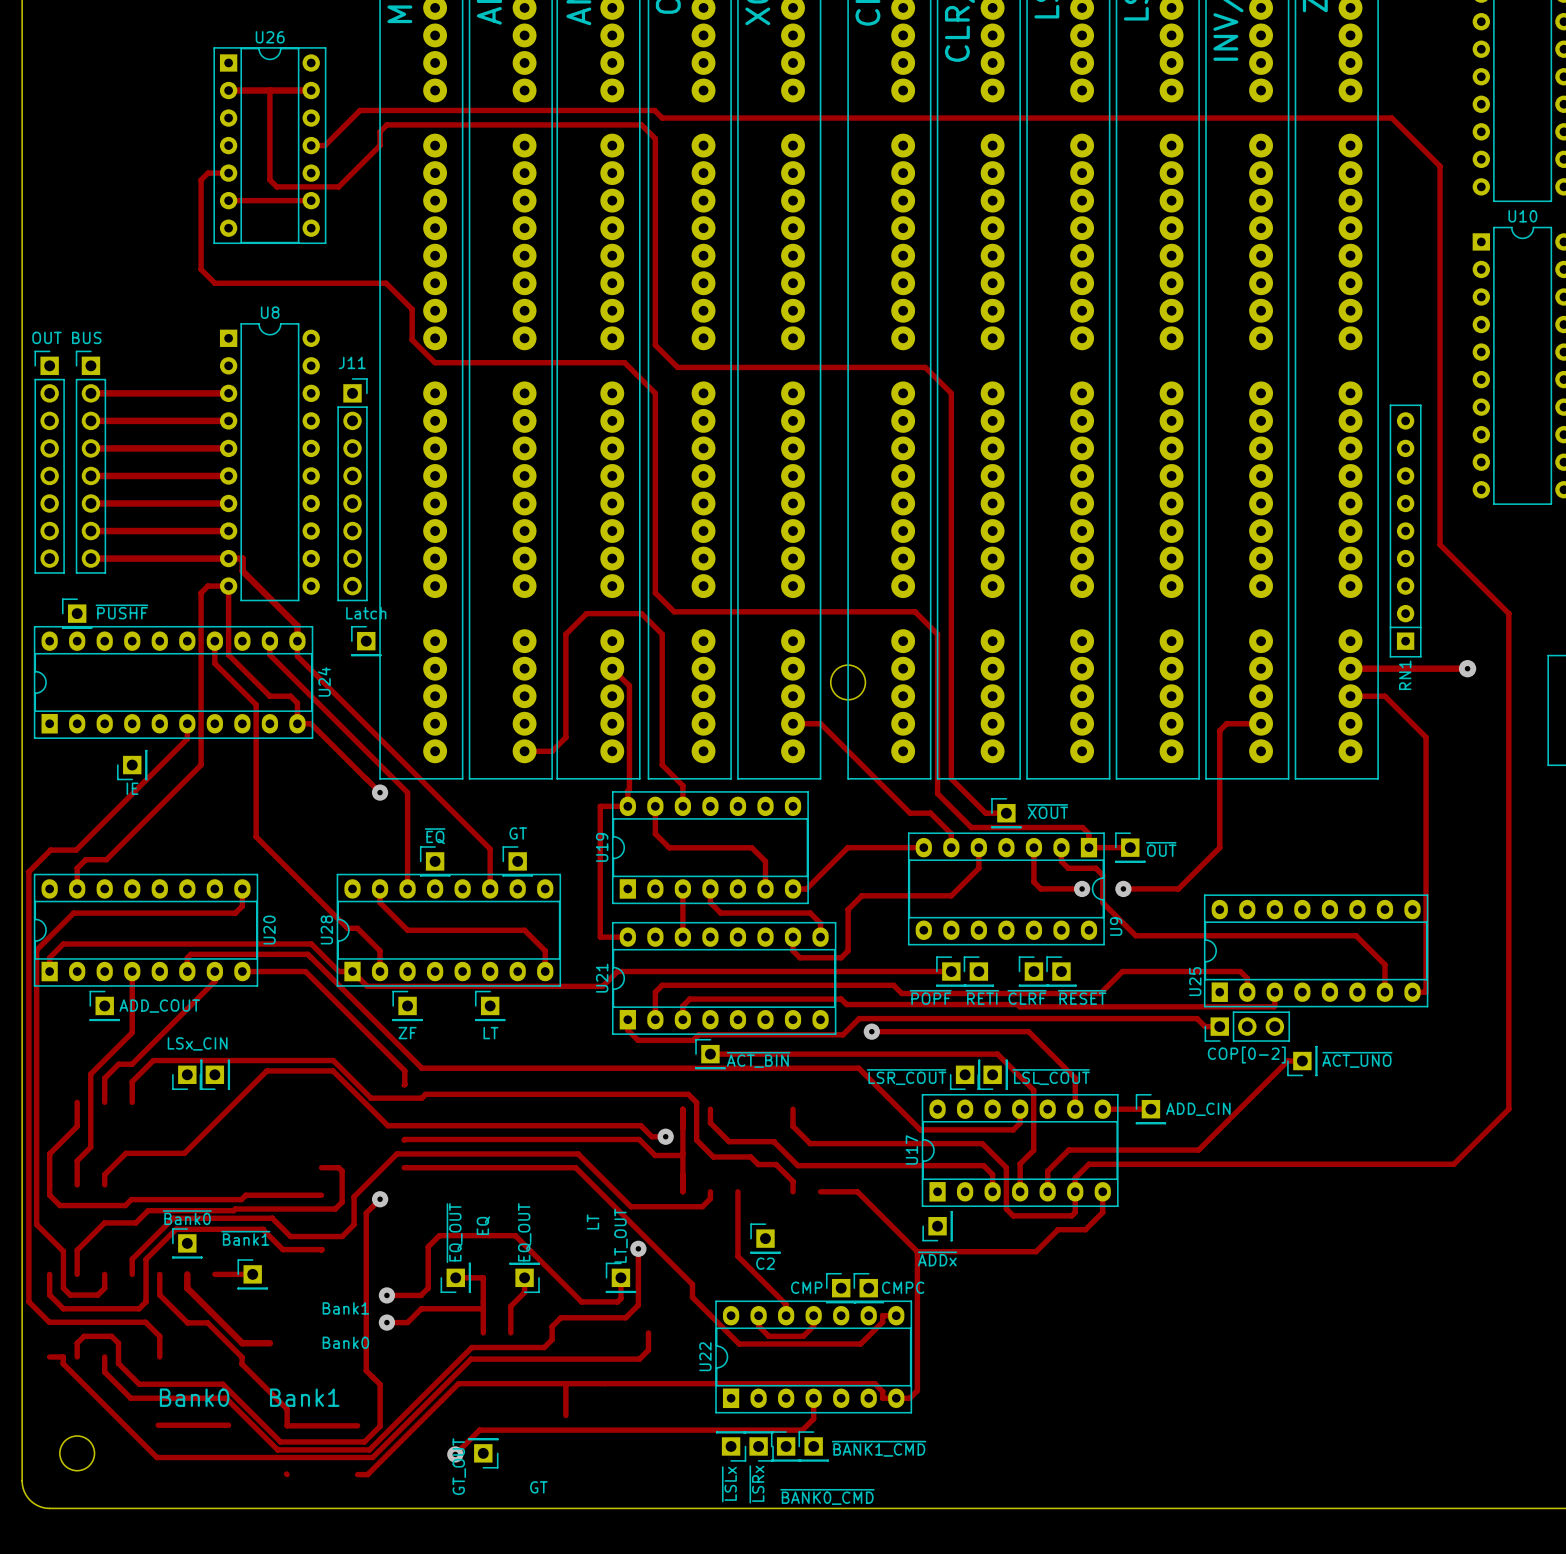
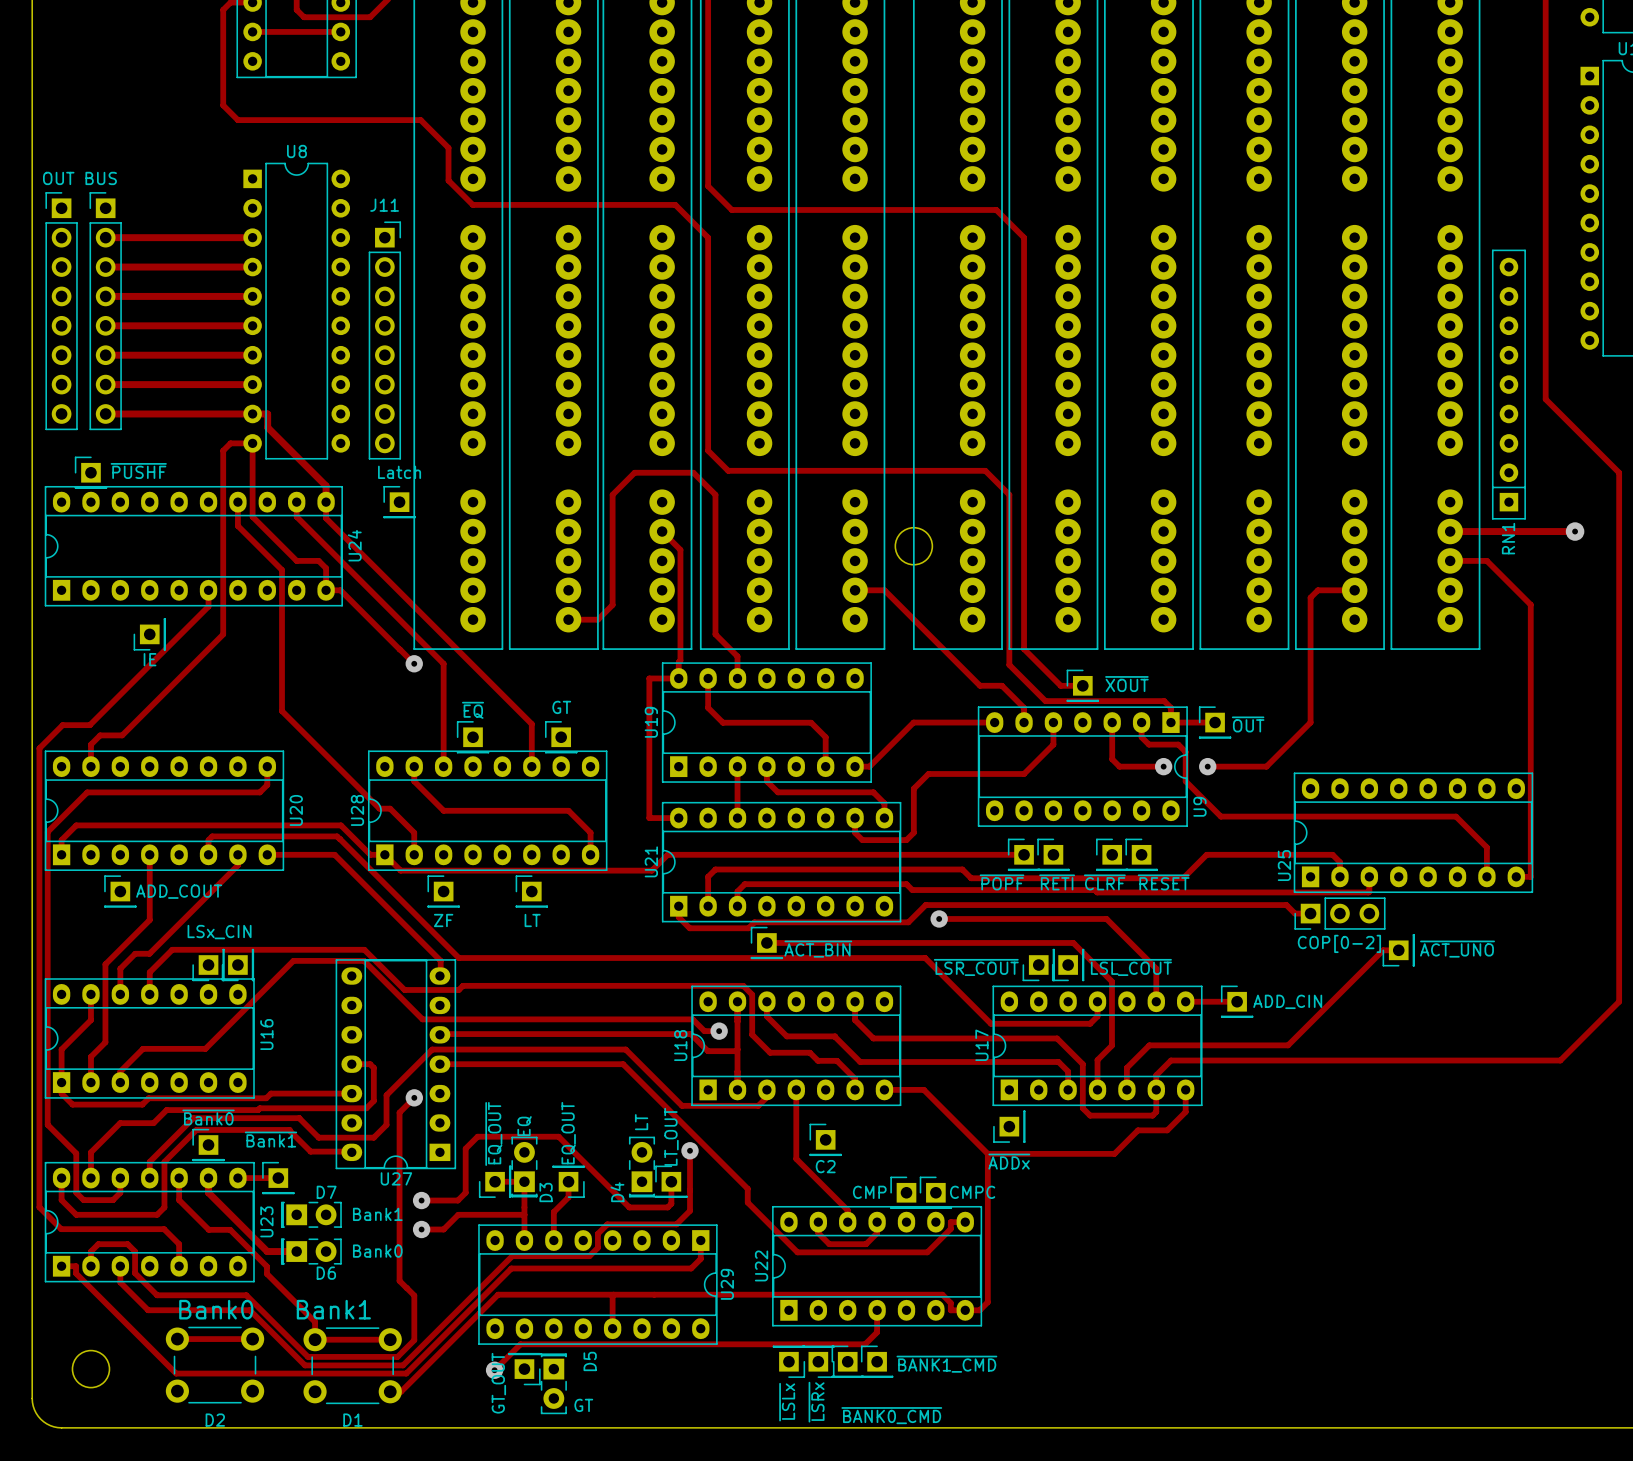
U16: none -> (149, 1038)
U18: none -> (796, 1045)
U27: none -> (395, 1064)
D3: none -> (524, 1167)
D4: none -> (642, 1167)
D7: none -> (311, 1214)
U23: none -> (149, 1222)
D6: none -> (311, 1251)
U29: none -> (597, 1284)
D2: none -> (215, 1365)
D1: none -> (352, 1365)
D5: none -> (553, 1383)

